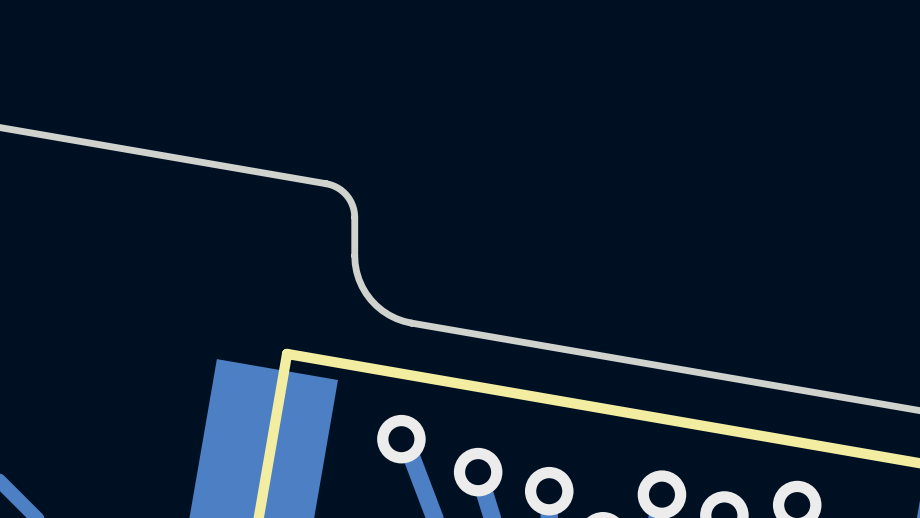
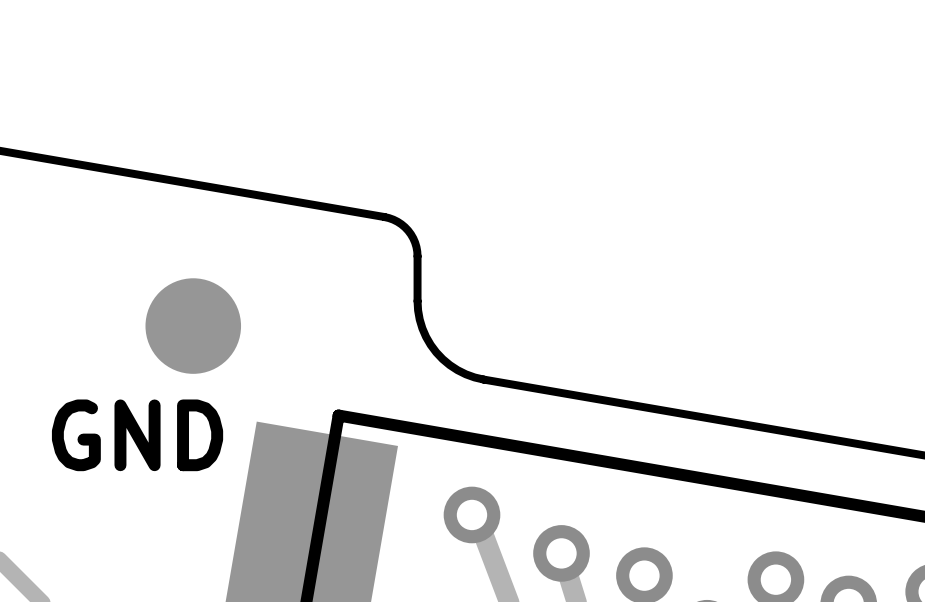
part: none -> GND (193, 326)

